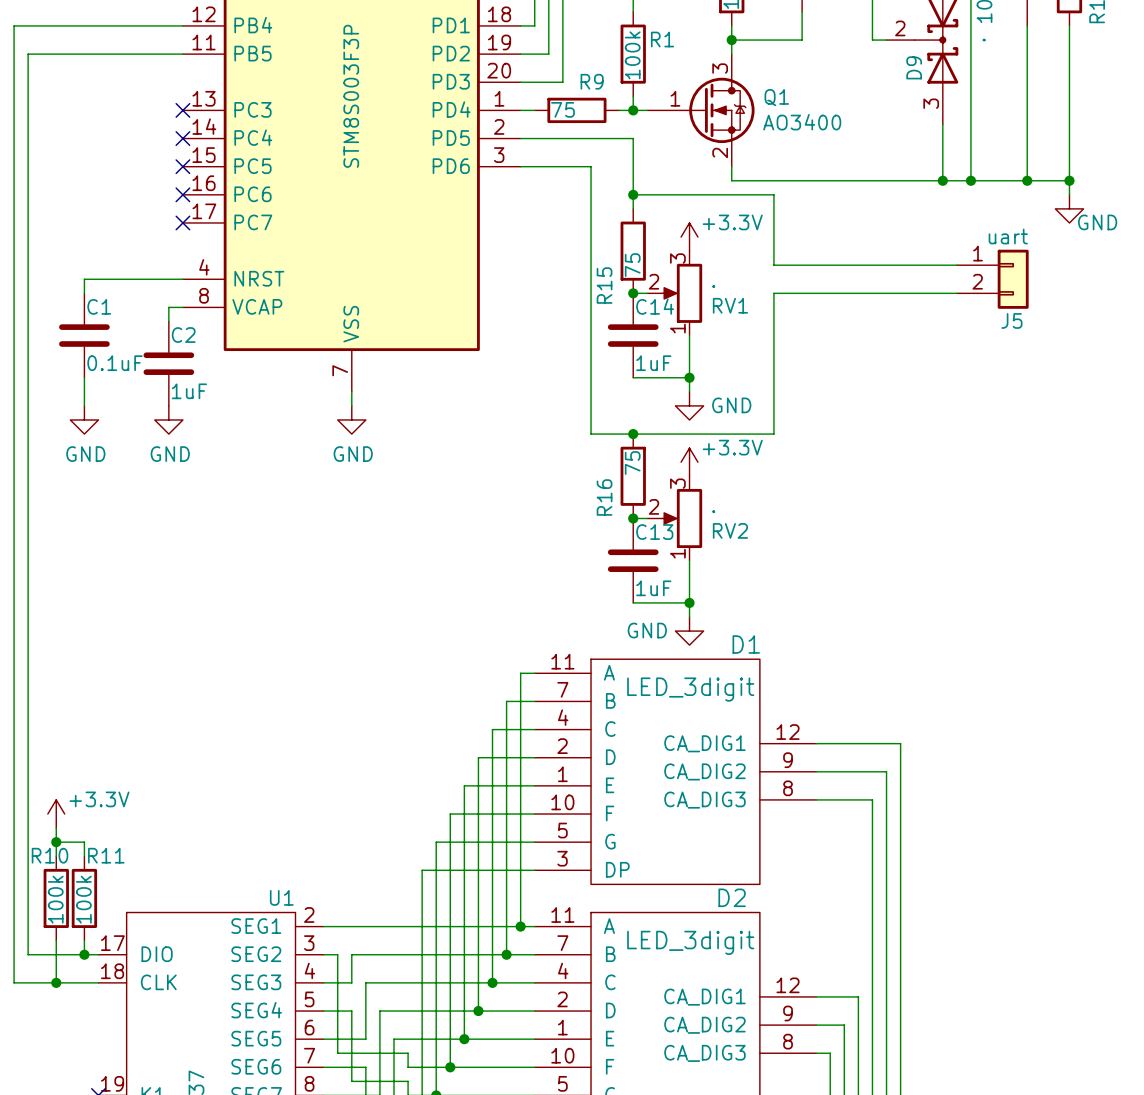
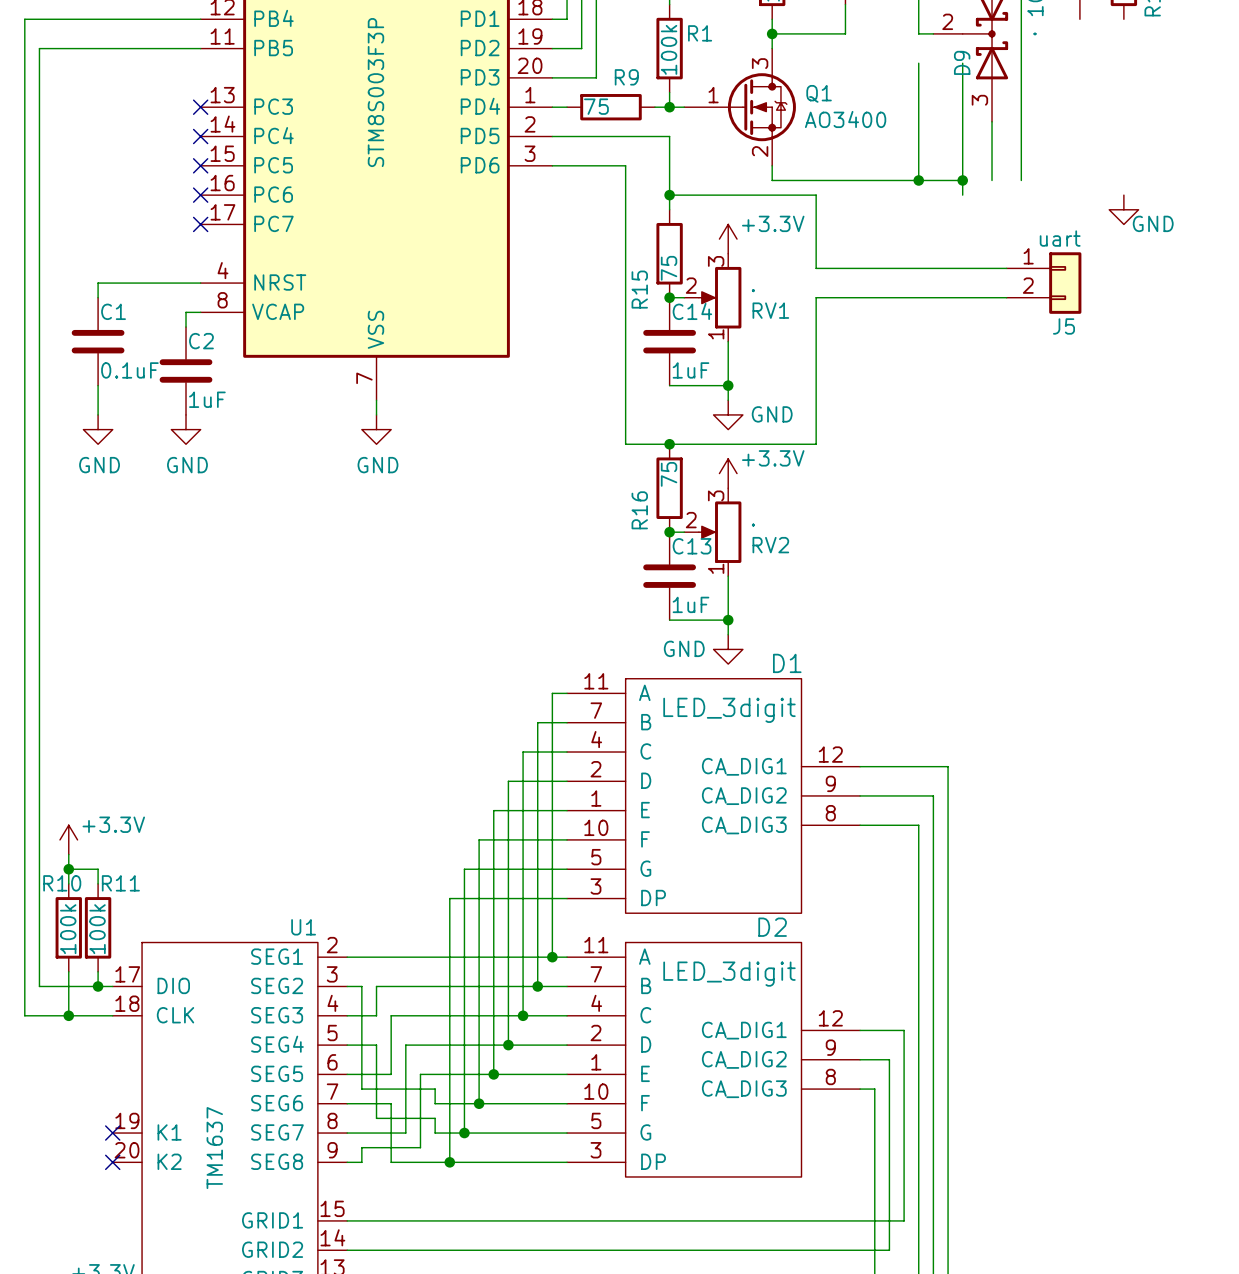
wire: (1027, 25) (1027, 180) -> none
wire: (1069, 25) (1069, 194) -> none
wire: none -> (918, 63) (918, 180)
wire: none -> (962, 63) (962, 195)
junction: none -> (918, 180)
wire: (914, 180) (1069, 180) -> none
junction: none -> (962, 180)
junction: (942, 180) -> none
junction: (970, 180) -> none
junction: (1027, 180) -> none
junction: (1069, 180) -> none

